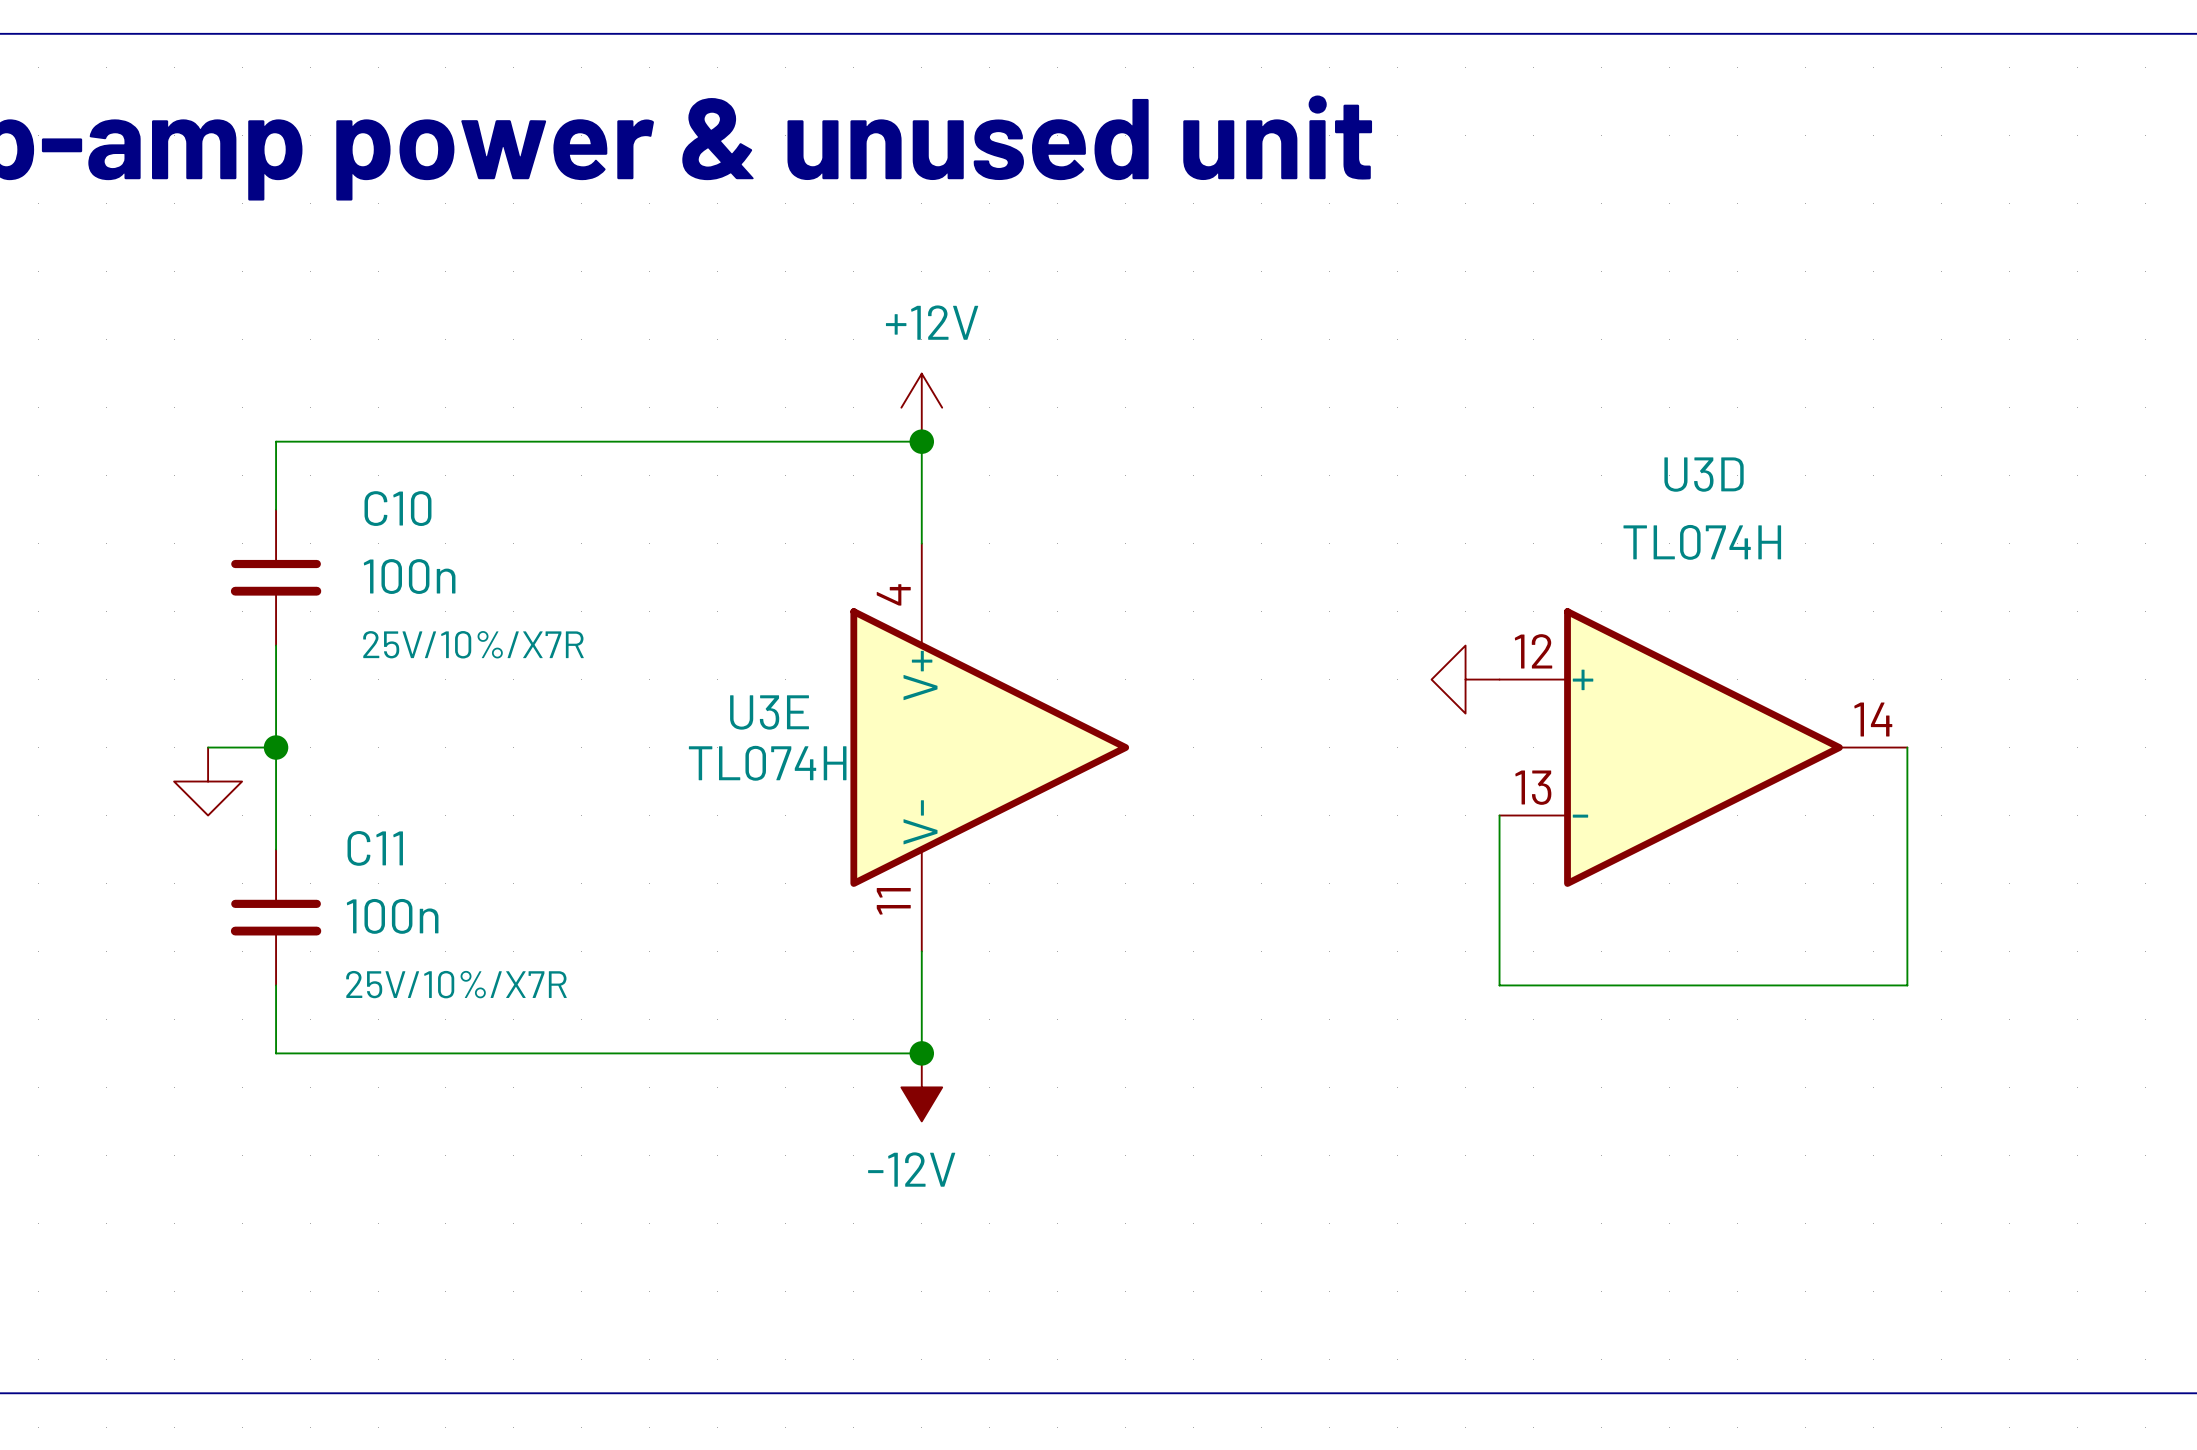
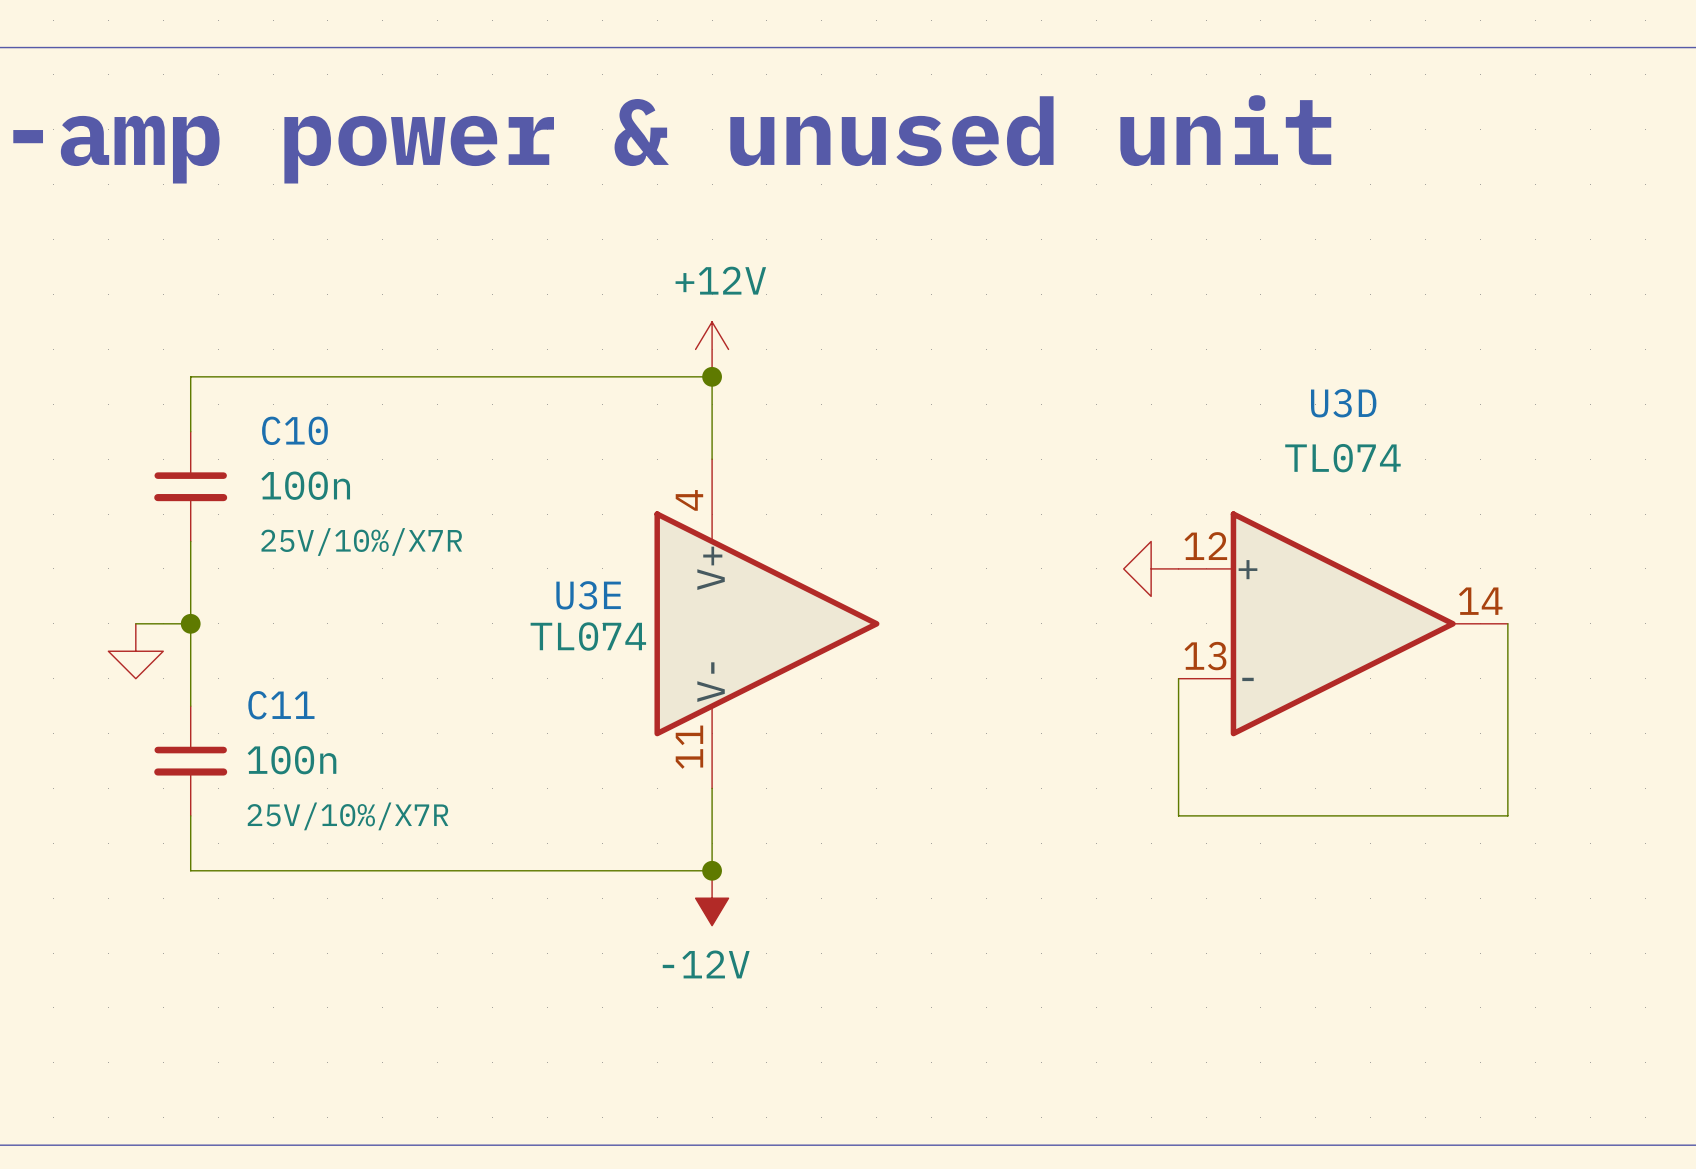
U3D value: TL074H (1702, 542) -> TL074 (1342, 458)
U3E value: TL074H (767, 763) -> TL074 (588, 636)

